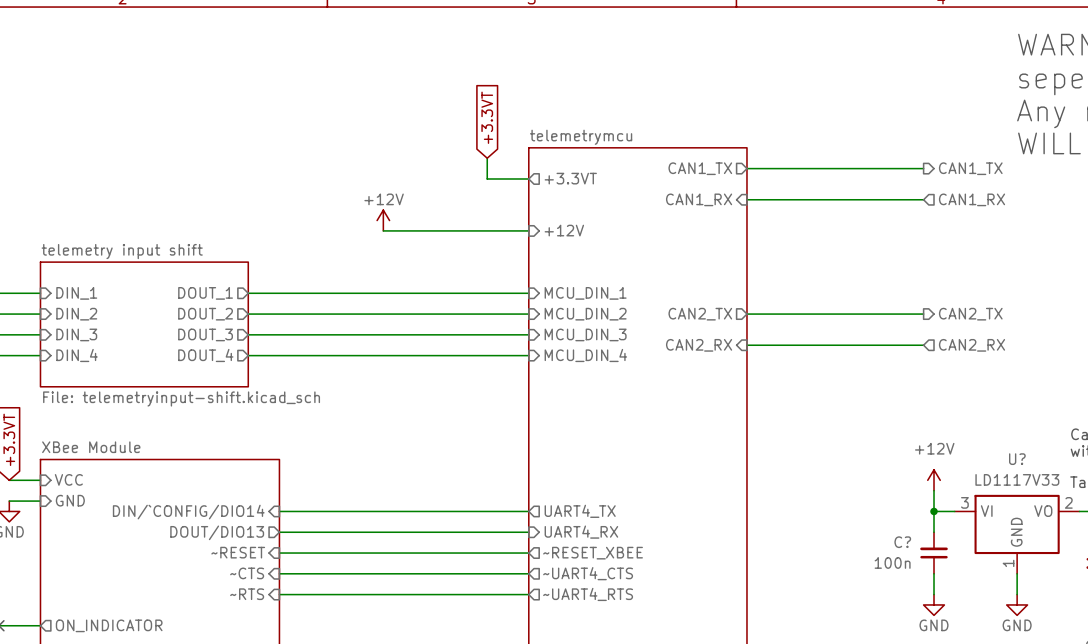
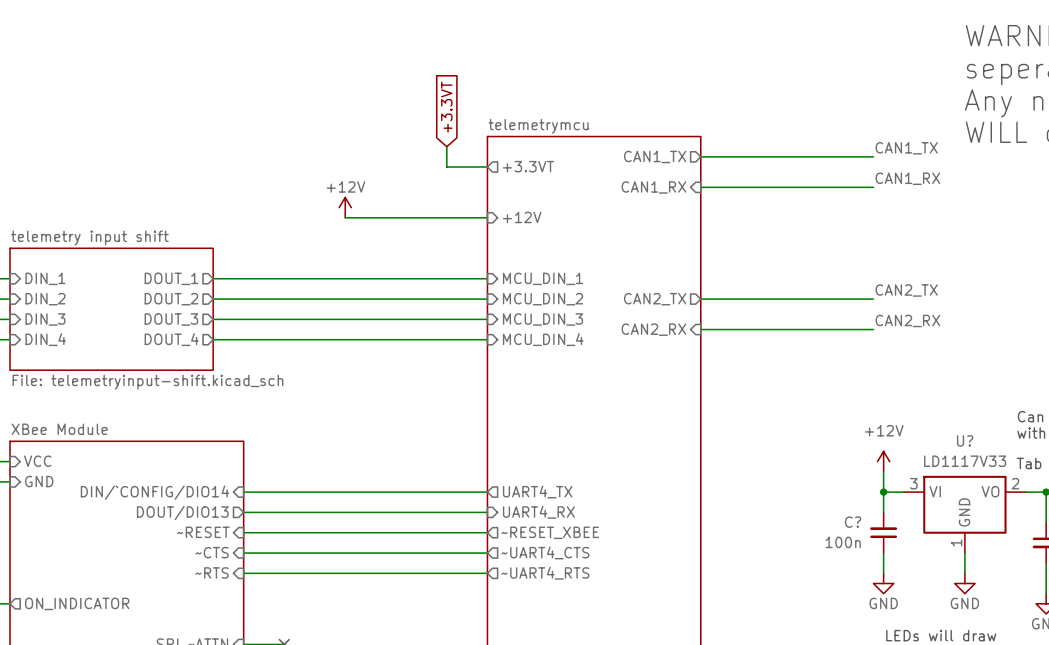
label: none -> CAN1_TX (906, 148)
hierarchical label: CAN1_TX (970, 168) -> none
label: none -> CAN1_RX (907, 178)
hierarchical label: CAN1_RX (972, 199) -> none
label: none -> CAN2_TX (906, 290)
hierarchical label: CAN2_TX (970, 314) -> none
label: none -> CAN2_RX (907, 320)
hierarchical label: CAN2_RX (972, 345) -> none

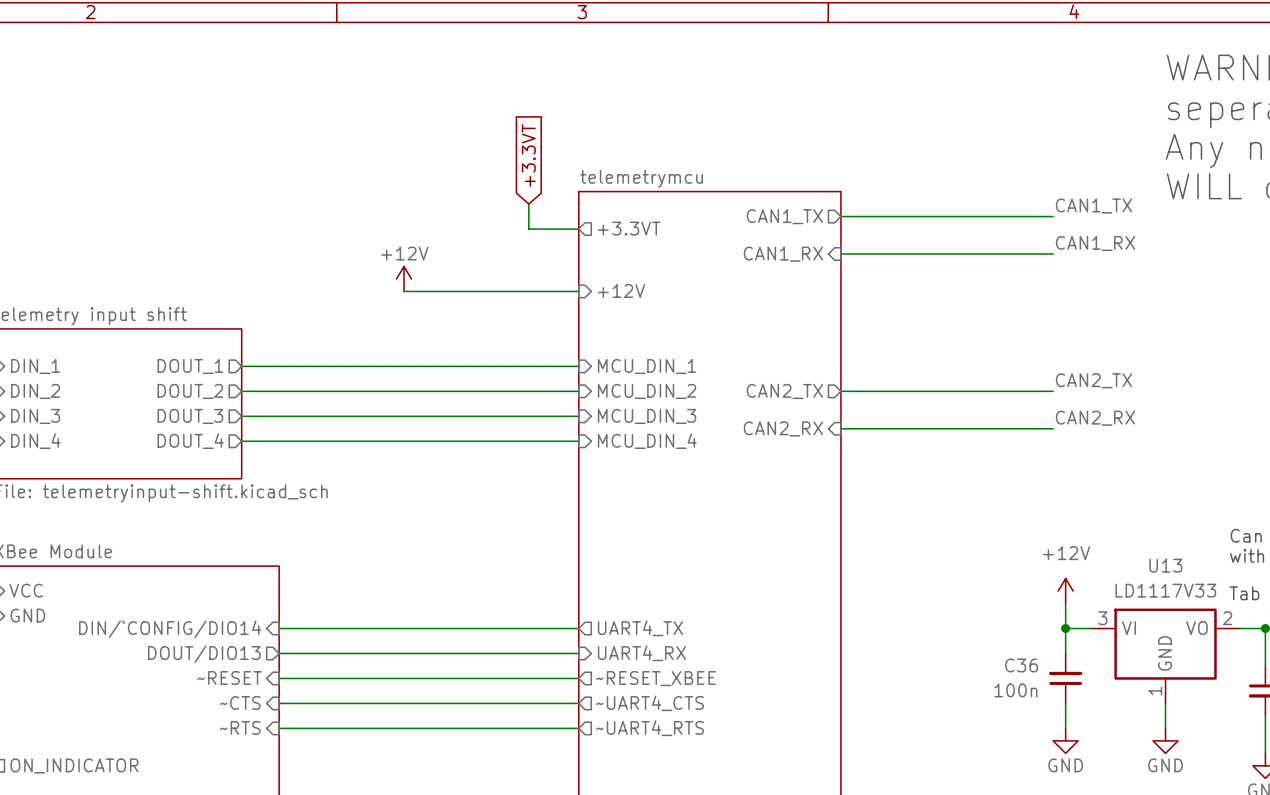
U? name: U? (965, 440) -> U13 (1165, 565)
C? name: C? (853, 522) -> C36 (1021, 665)

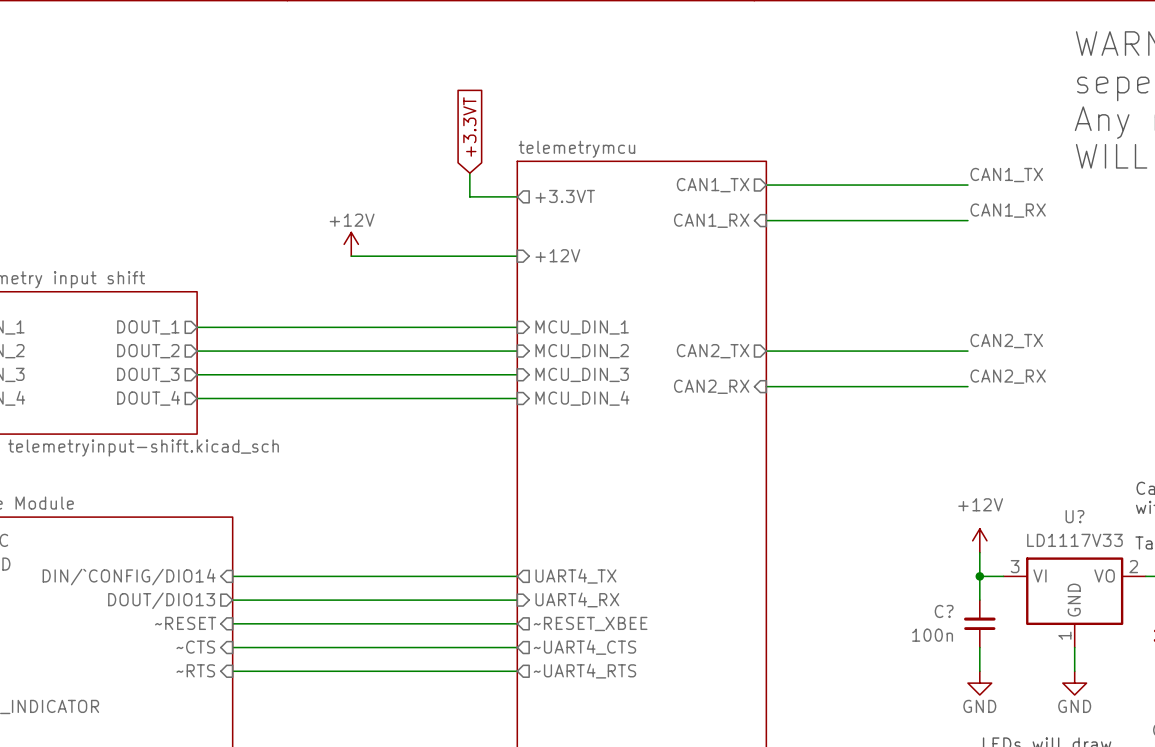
U13 name: U13 (1165, 565) -> U? (1074, 516)
C36 name: C36 (1021, 665) -> C? (944, 611)

